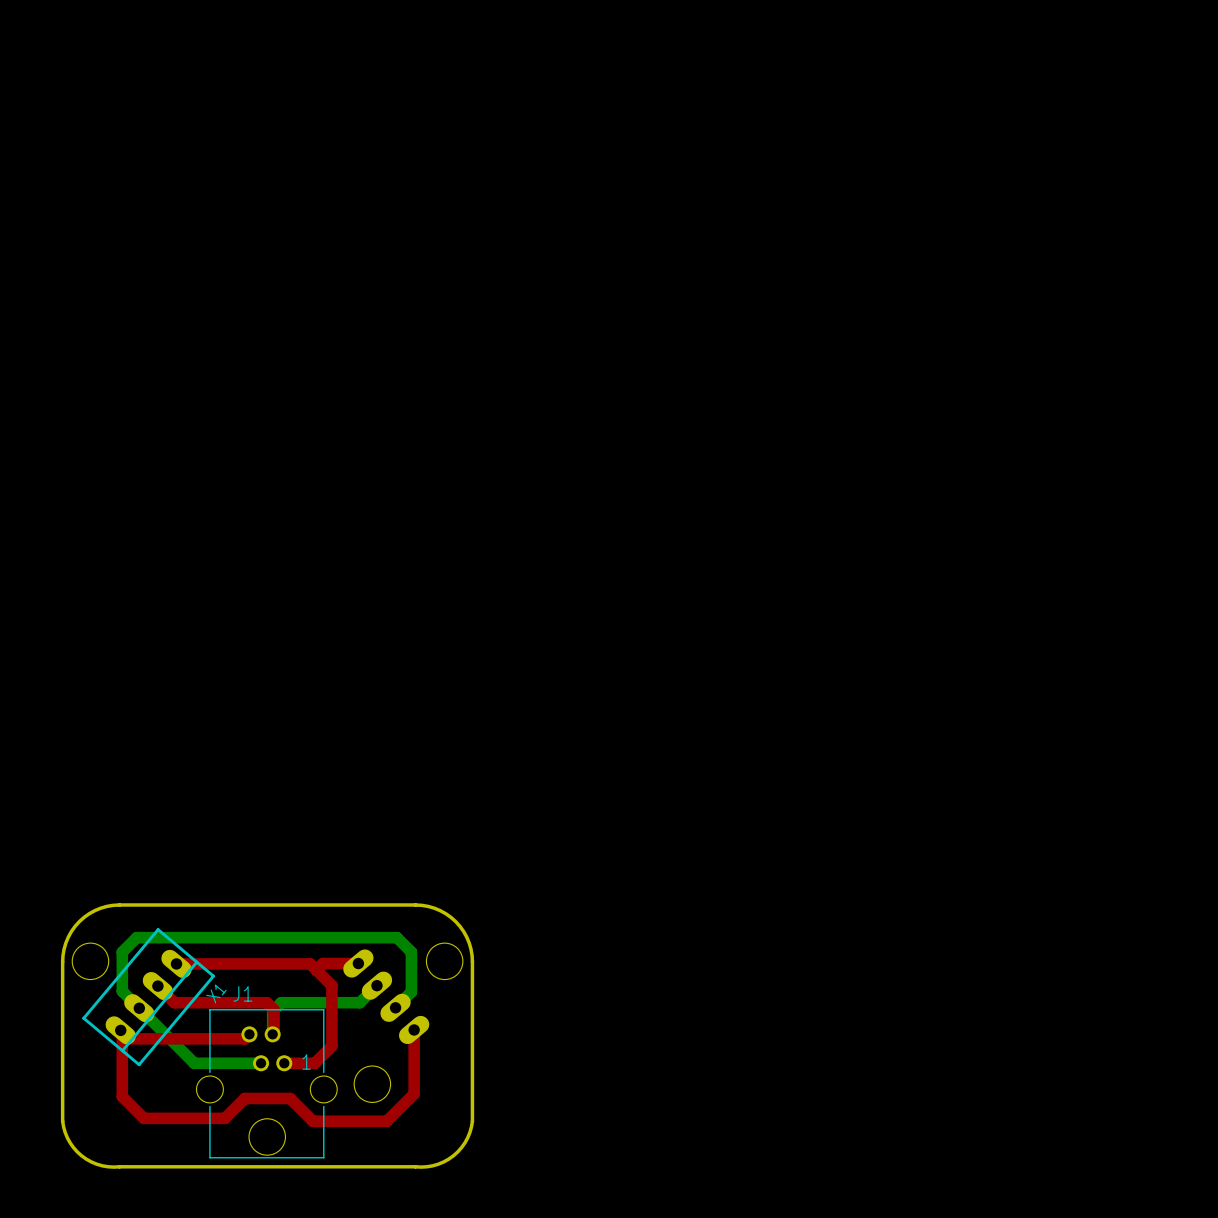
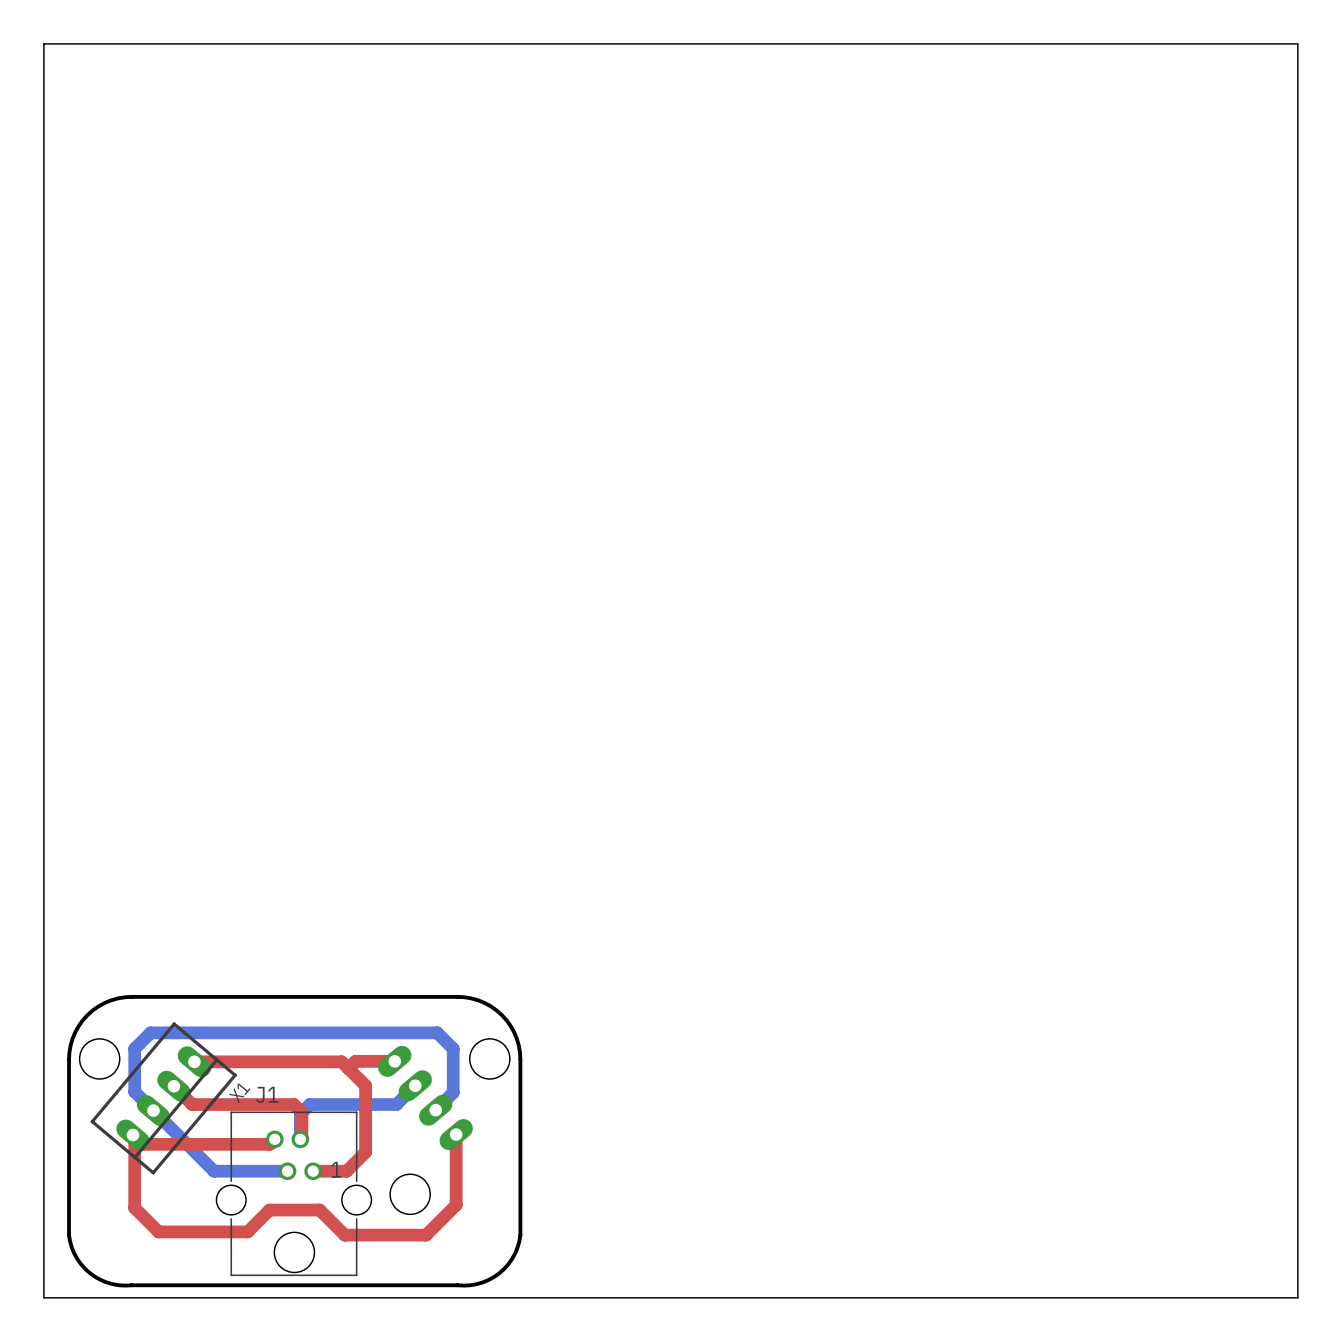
board edge: none -> (43, 43) (43, 1297) (1297, 1297) (1297, 43) (43, 43)

